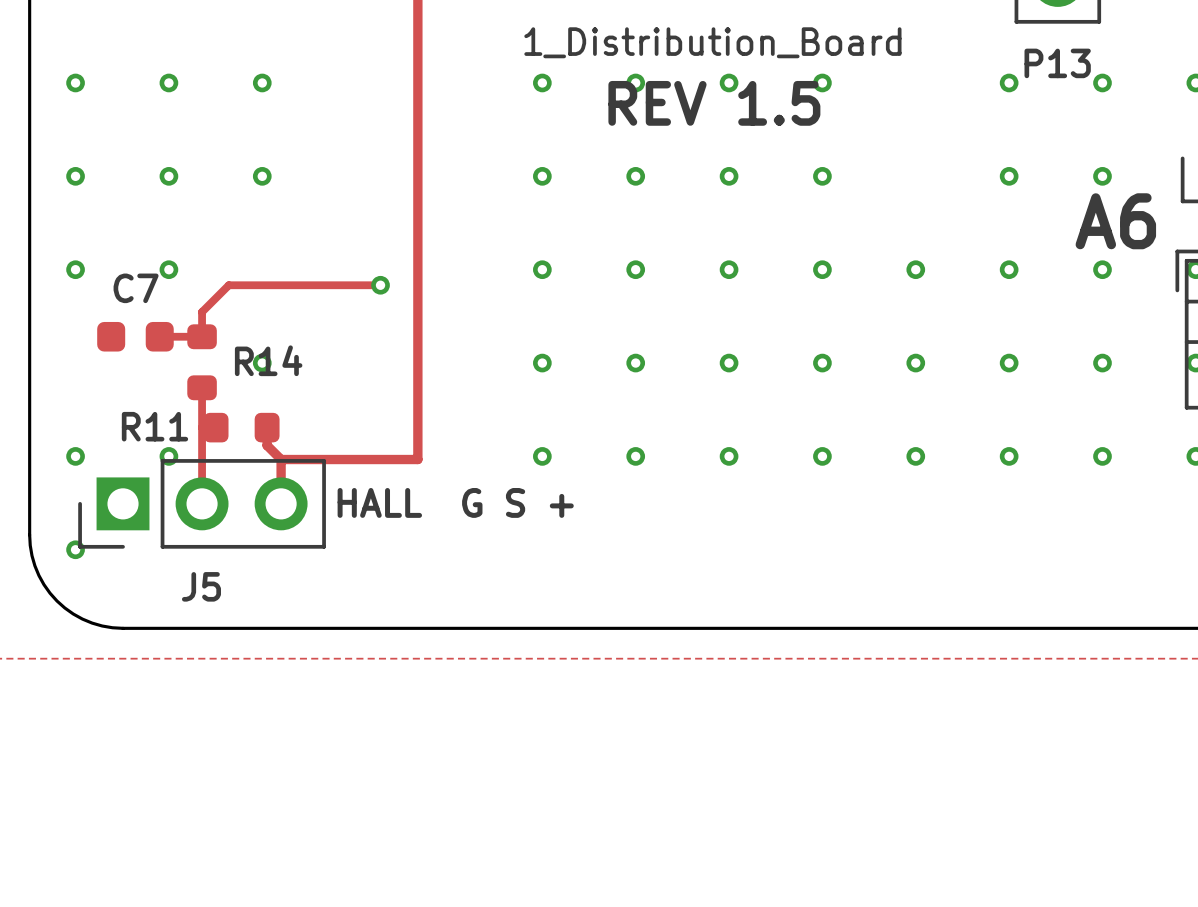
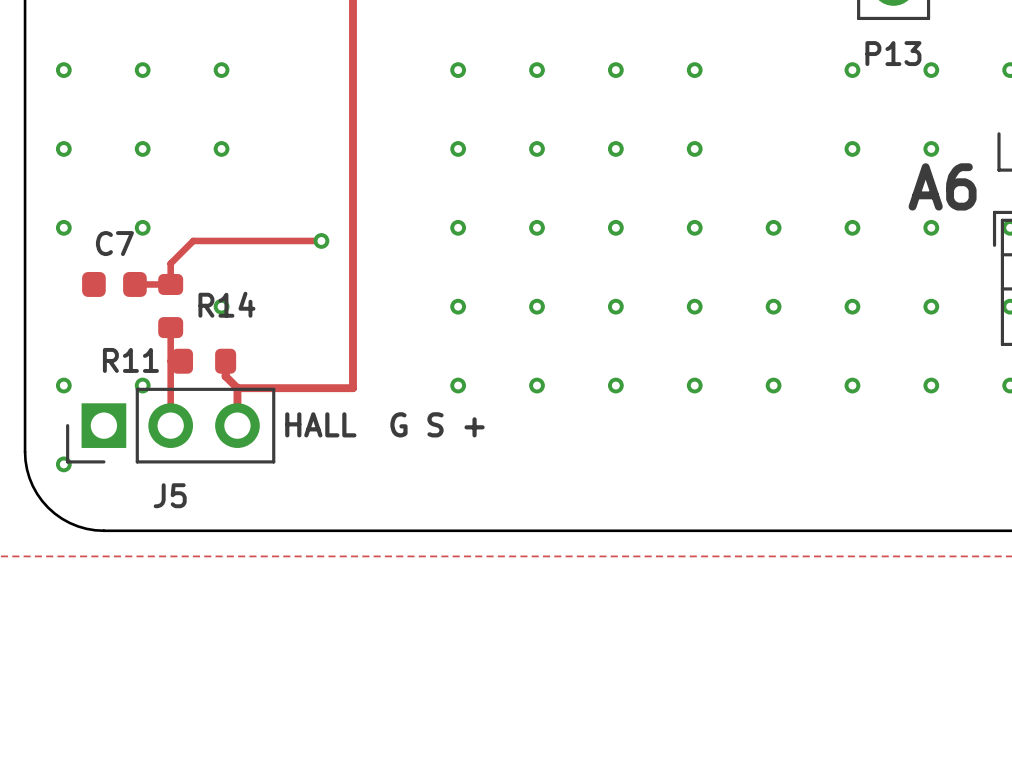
text: 1_Distribution_Board (712, 42) -> none
text: REV 1.5 (714, 103) -> none

